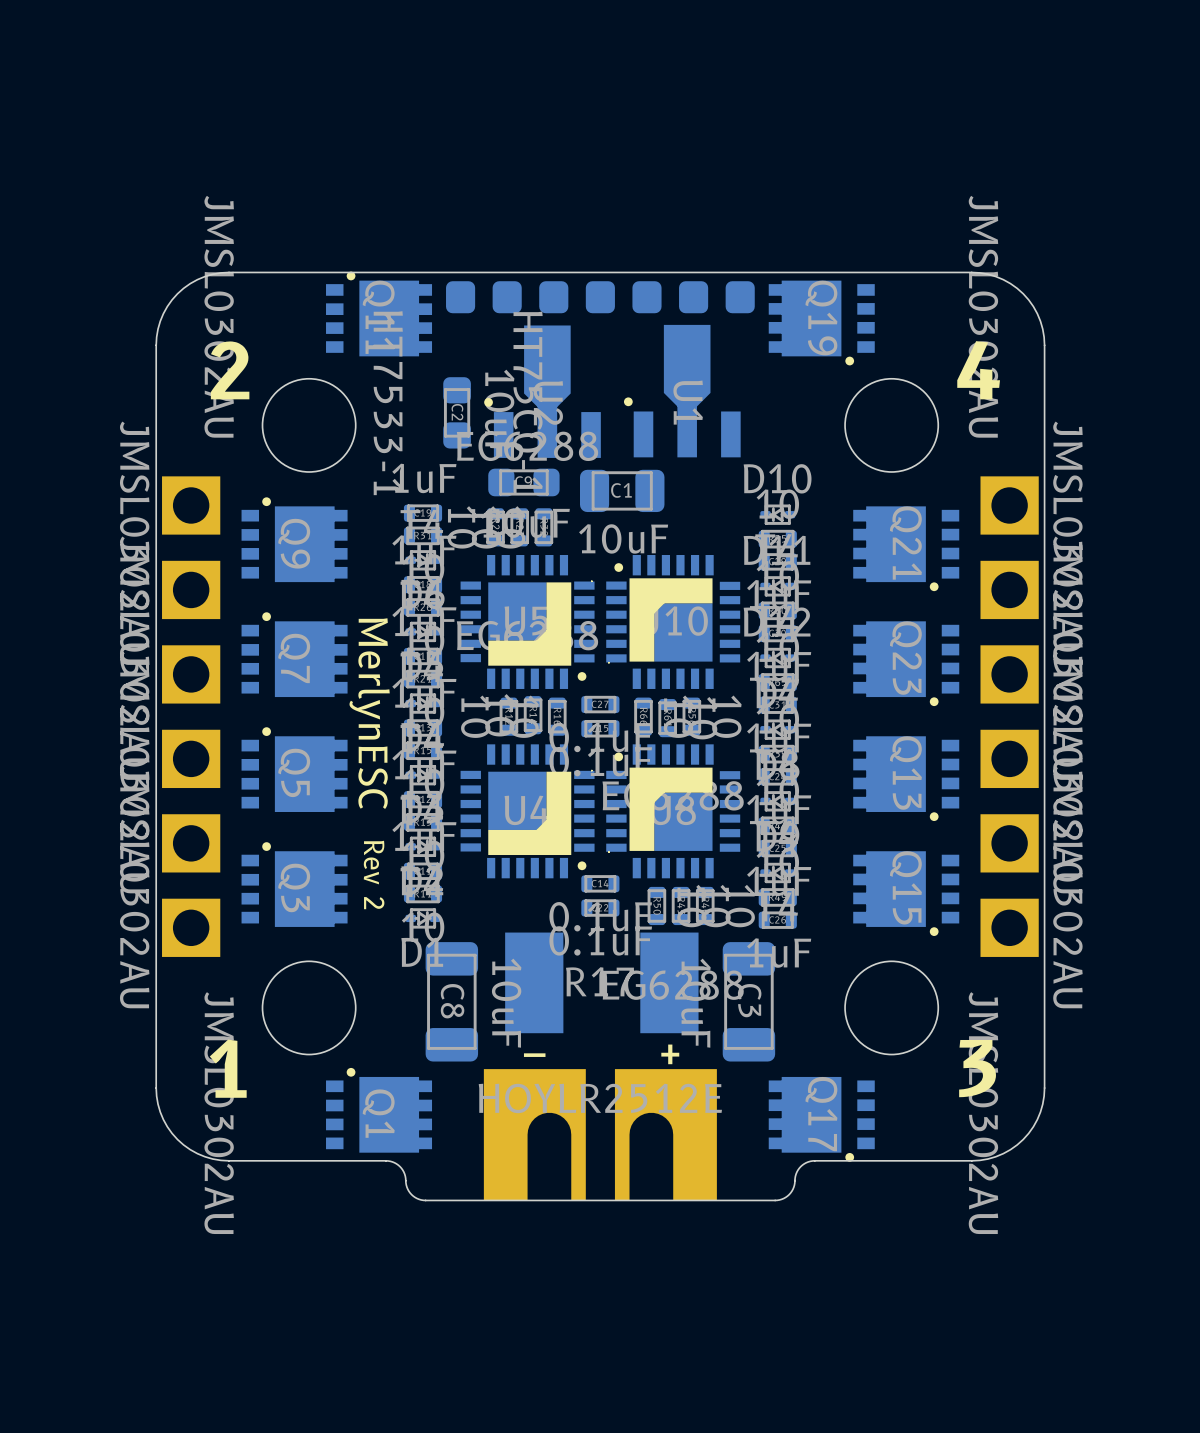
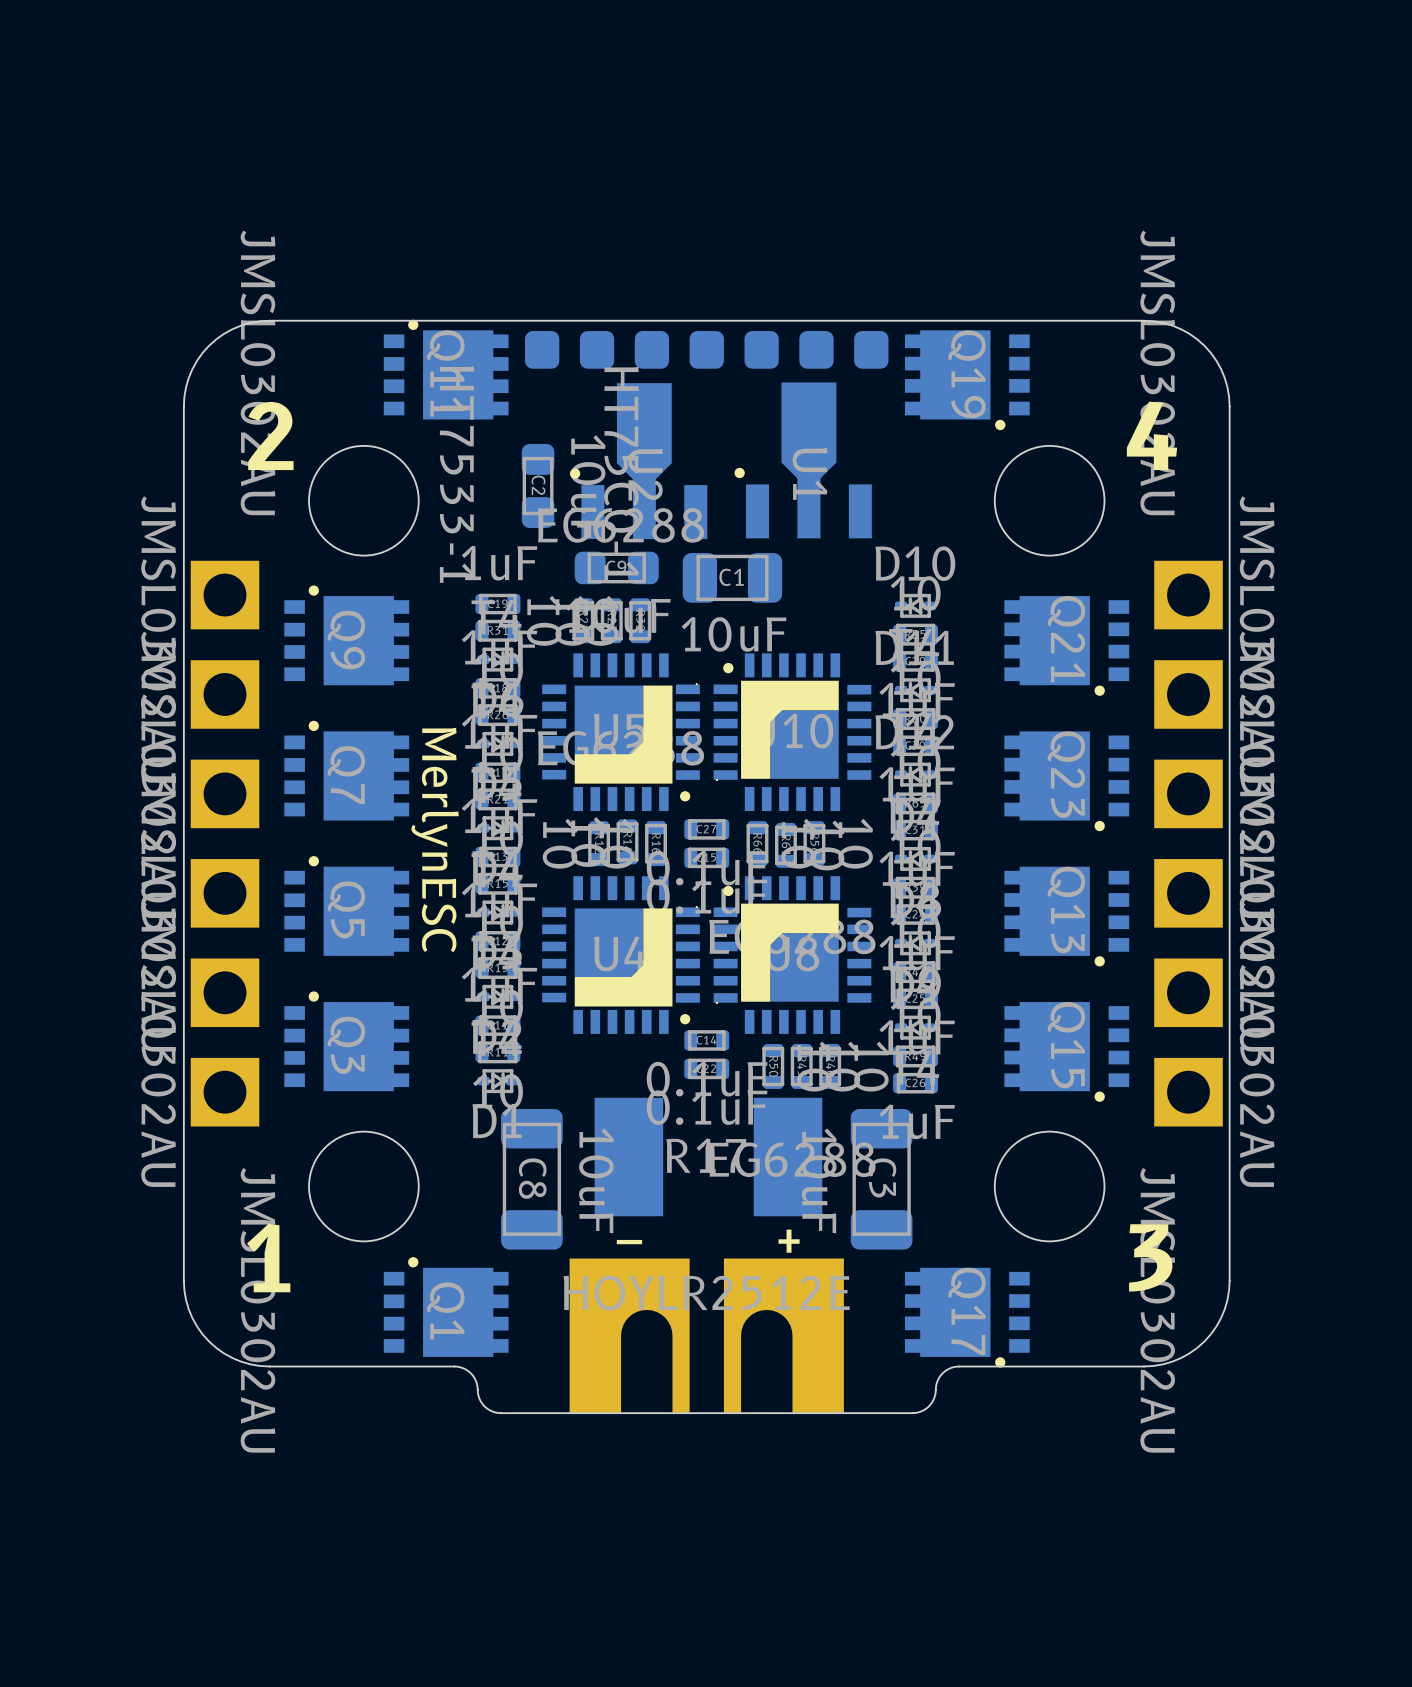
text: Rev 2 (374, 874) -> none

